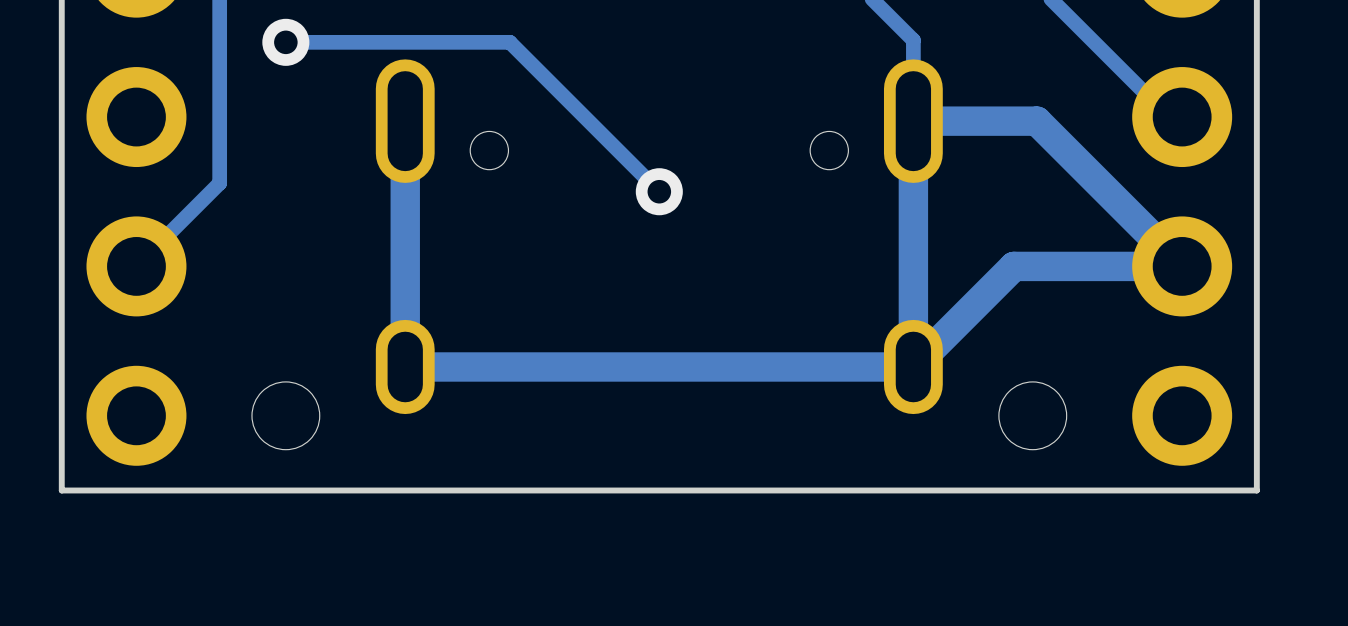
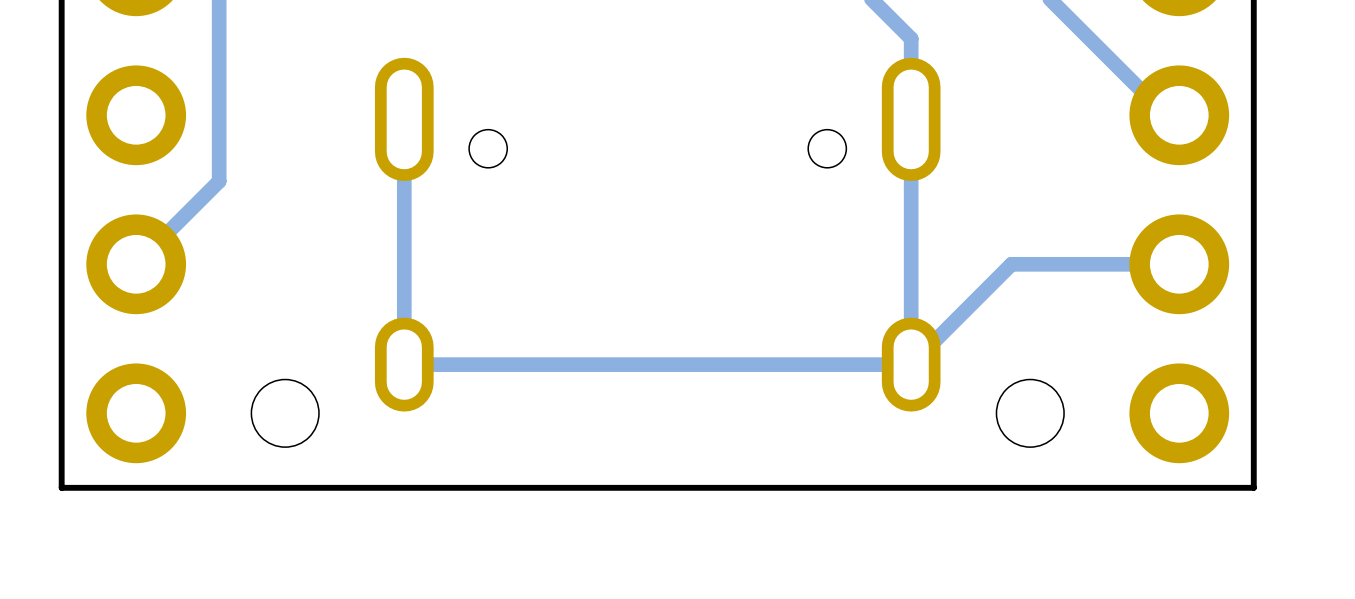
track: (285, 42) (509, 42) (659, 191) -> none
via: (285, 42) -> none
track width: thick (405, 121) (405, 366) (913, 366) -> thin (404, 119) (404, 364) (911, 364)
track: (913, 121) (1036, 121) (1182, 266) -> none
track width: thick (913, 121) (913, 366) -> thin (911, 119) (911, 364)
via: (659, 191) -> none
track width: thick (1182, 266) (1013, 266) (913, 366) -> thin (1179, 264) (1011, 264) (911, 364)

